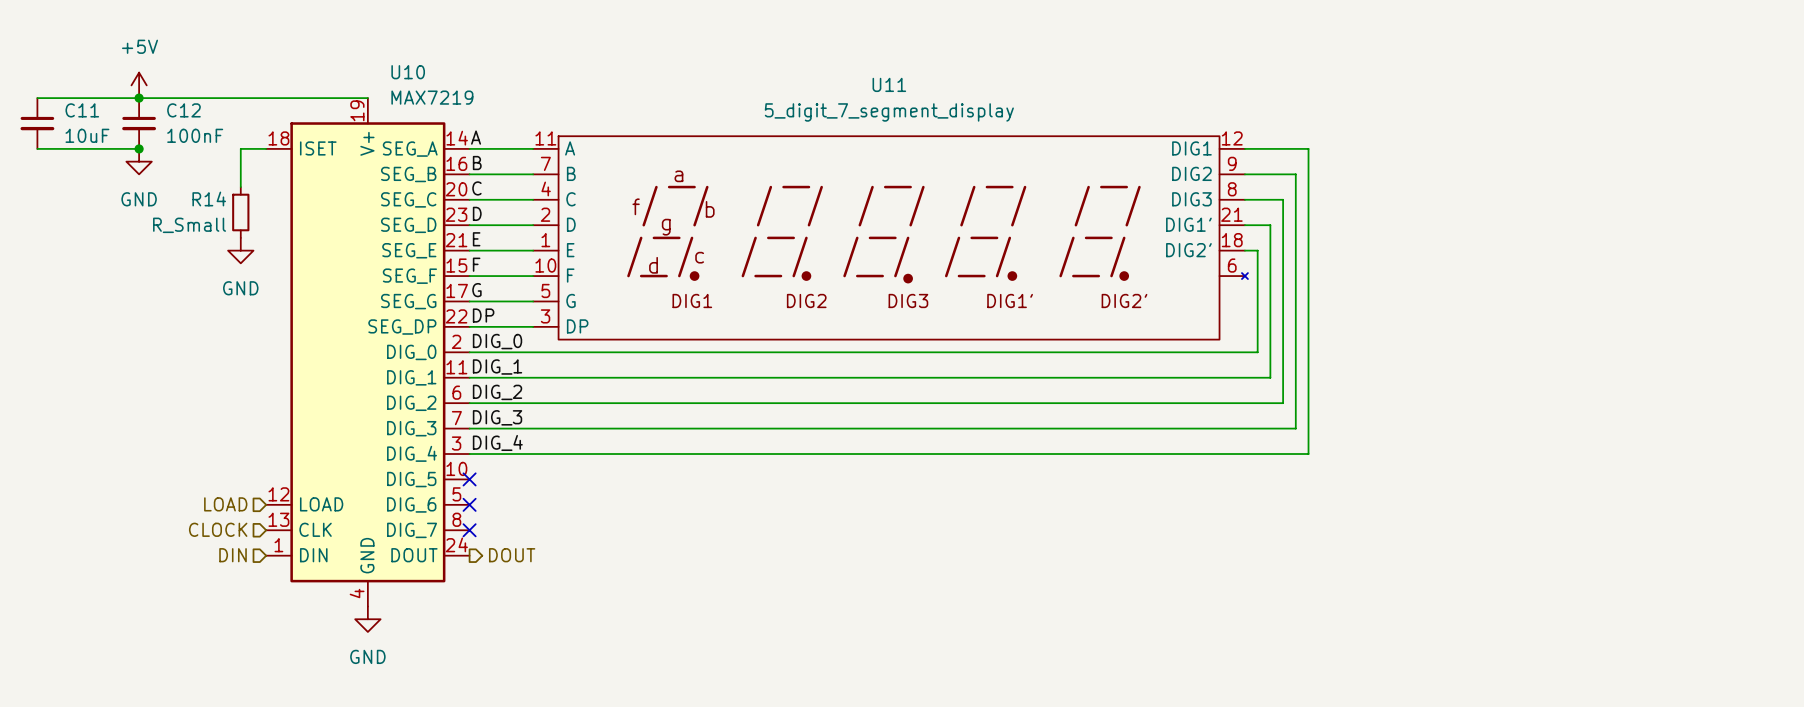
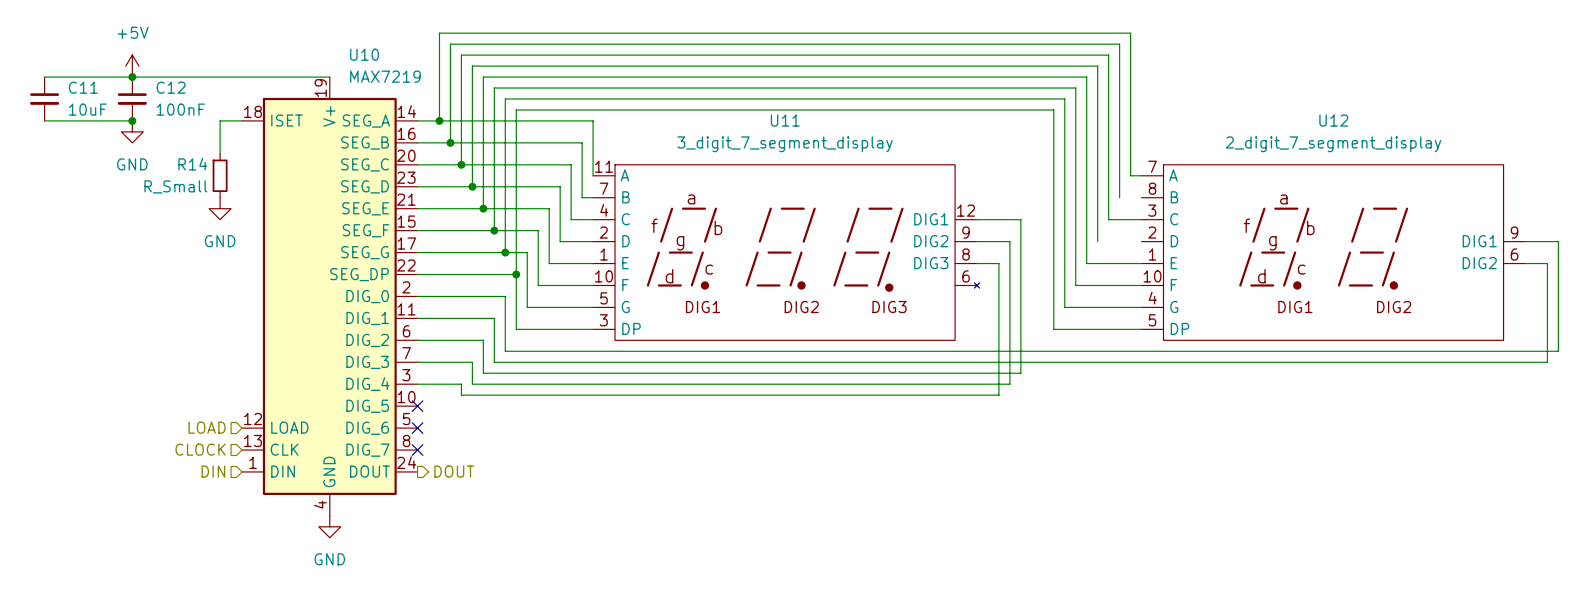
U11 value: 5_digit_7_segment_display (889, 112) -> 3_digit_7_segment_display (785, 144)
U11 symbol: [533, 136, 1248, 340] -> [593, 164, 980, 341]
label: A (476, 137) -> none
junction: none -> (439, 120)
wire: none -> (472, 120) (593, 120) (593, 175)
wire: (1244, 148) (1308, 148) (1308, 454) (1155, 454) -> (977, 241) (1009, 241) (1009, 384)
label: B (477, 163) -> none
junction: none -> (450, 142)
wire: none -> (472, 142) (582, 142) (582, 197) (593, 197)
wire: (1244, 174) (1295, 174) -> (439, 120) (439, 33) (1130, 33) (1130, 142)
label: C (476, 188) -> none
junction: none -> (461, 164)
wire: none -> (472, 164) (571, 164) (571, 219) (593, 219)
wire: (1244, 199) (1283, 199) -> (450, 142) (450, 44) (1119, 44) (1119, 164)
wire: (1295, 212) (1295, 428) -> (1130, 175) (1141, 175)
label: D (477, 213) -> none
junction: none -> (472, 186)
wire: (1244, 225) (1270, 225) -> (461, 164) (461, 55) (1108, 55) (1108, 186)
wire: (1283, 237) (1283, 403) (545, 403) -> (977, 219) (1020, 219) (1020, 373) (483, 373) (483, 340)
label: E (476, 239) -> none
wire: none -> (472, 208) (549, 208) (549, 263) (593, 263)
wire: none -> (483, 208) (483, 77) (1086, 77) (1086, 263) (1141, 263)
junction: none -> (483, 208)
wire: (1244, 250) (1257, 250) -> (593, 241) (560, 241) (560, 186) (472, 186) (472, 66) (1097, 66) (1097, 208)
wire: (1270, 263) (1270, 377) (558, 377) -> (1108, 219) (1141, 219)
label: F (476, 264) -> none
wire: none -> (472, 230) (538, 230) (538, 285) (593, 285)
wire: none -> (494, 230) (494, 88) (1075, 88) (1075, 285) (1141, 285)
junction: none -> (494, 230)
wire: (1257, 288) (1257, 352) (571, 352) -> (1525, 241) (1558, 241) (1558, 351) (505, 351) (505, 296)
label: G (476, 290) -> none
wire: none -> (472, 252) (527, 252) (527, 307) (593, 307)
wire: none -> (505, 252) (505, 98) (1064, 98) (1064, 307) (1141, 307)
junction: none -> (505, 252)
U12: none -> 2_digit_7_segment_display (1333, 252)
wire: none -> (977, 263) (998, 263) (998, 395) (461, 395) (461, 384)
wire: none -> (1525, 263) (1547, 263) (1547, 362) (1130, 362)
label: DP (483, 315) -> none
junction: none -> (516, 274)
label: DIG_0 (497, 341) -> none
label: DIG_1 (497, 367) -> none
wire: none -> (593, 329) (516, 329) (516, 109) (1053, 109) (1053, 329) (1141, 329)
label: DIG_2 (497, 392) -> none
label: DIG_3 (497, 417) -> none
wire: (533, 428) (558, 428) -> (494, 318) (494, 362)
label: DIG_4 (497, 442) -> none
wire: (520, 454) (533, 454) -> (472, 362) (472, 384)

